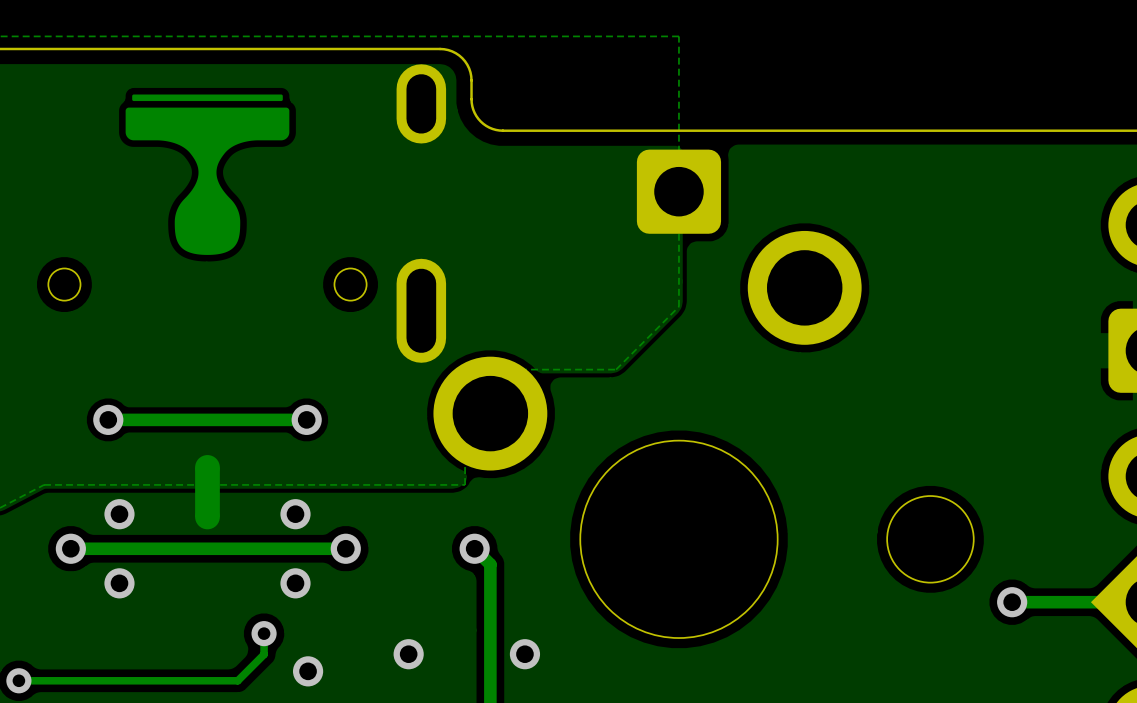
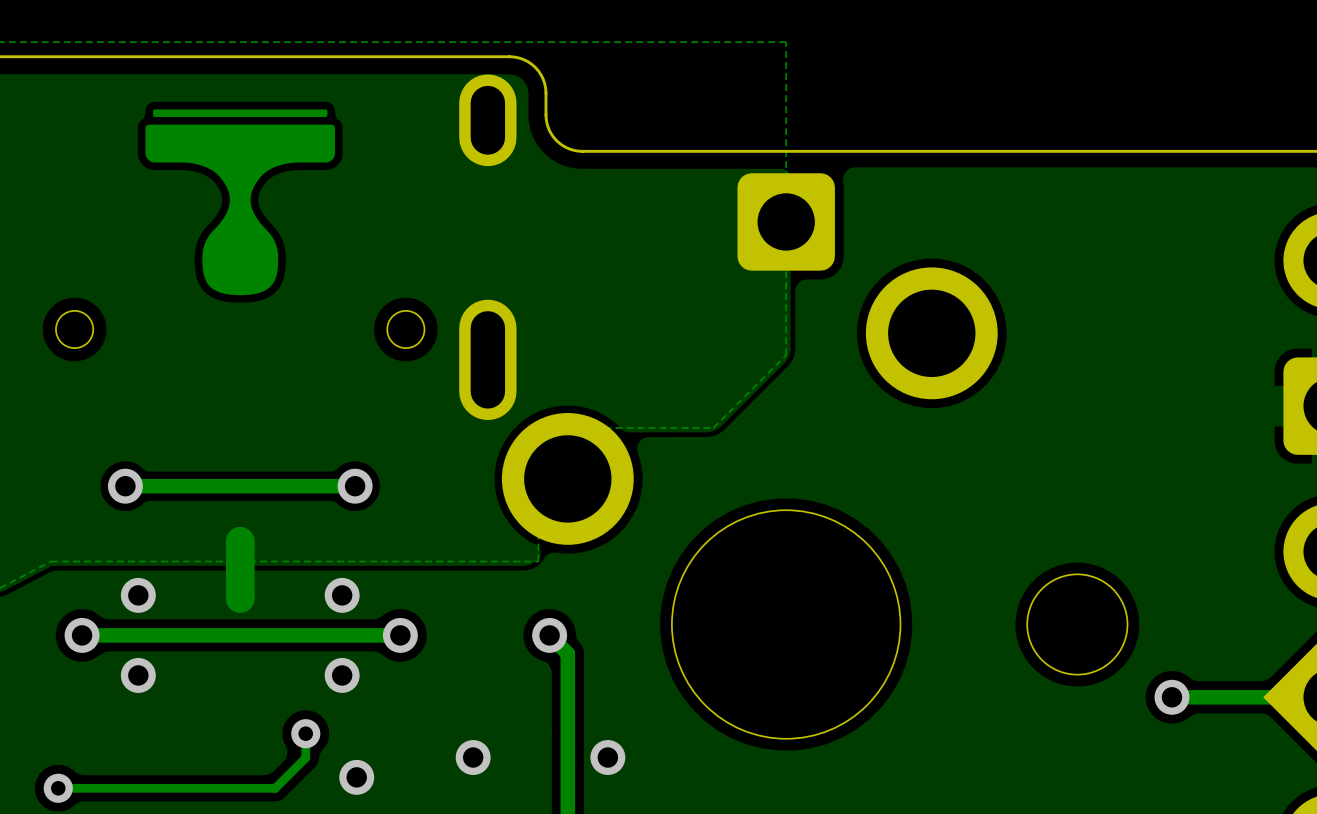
via position: (18, 680) -> (58, 788)
track: (50, 680) (18, 680) -> none

